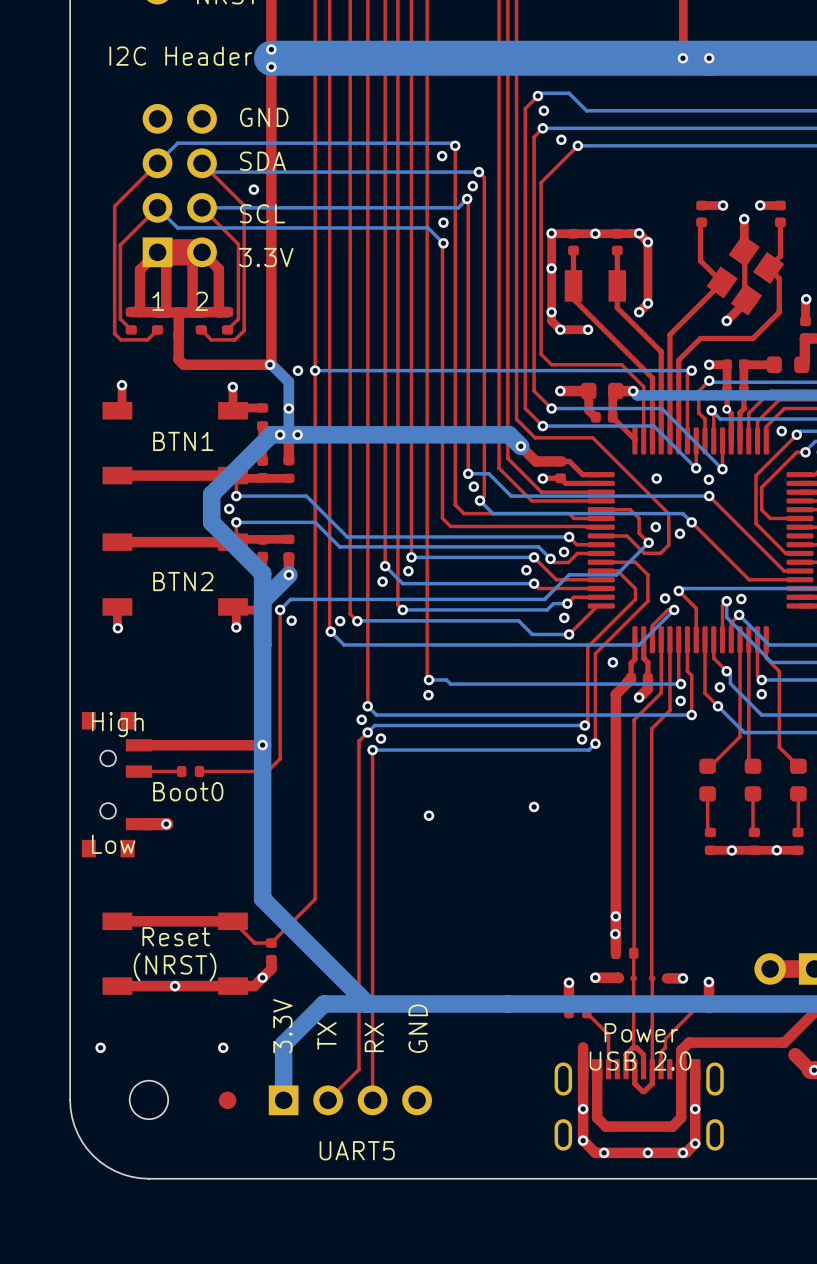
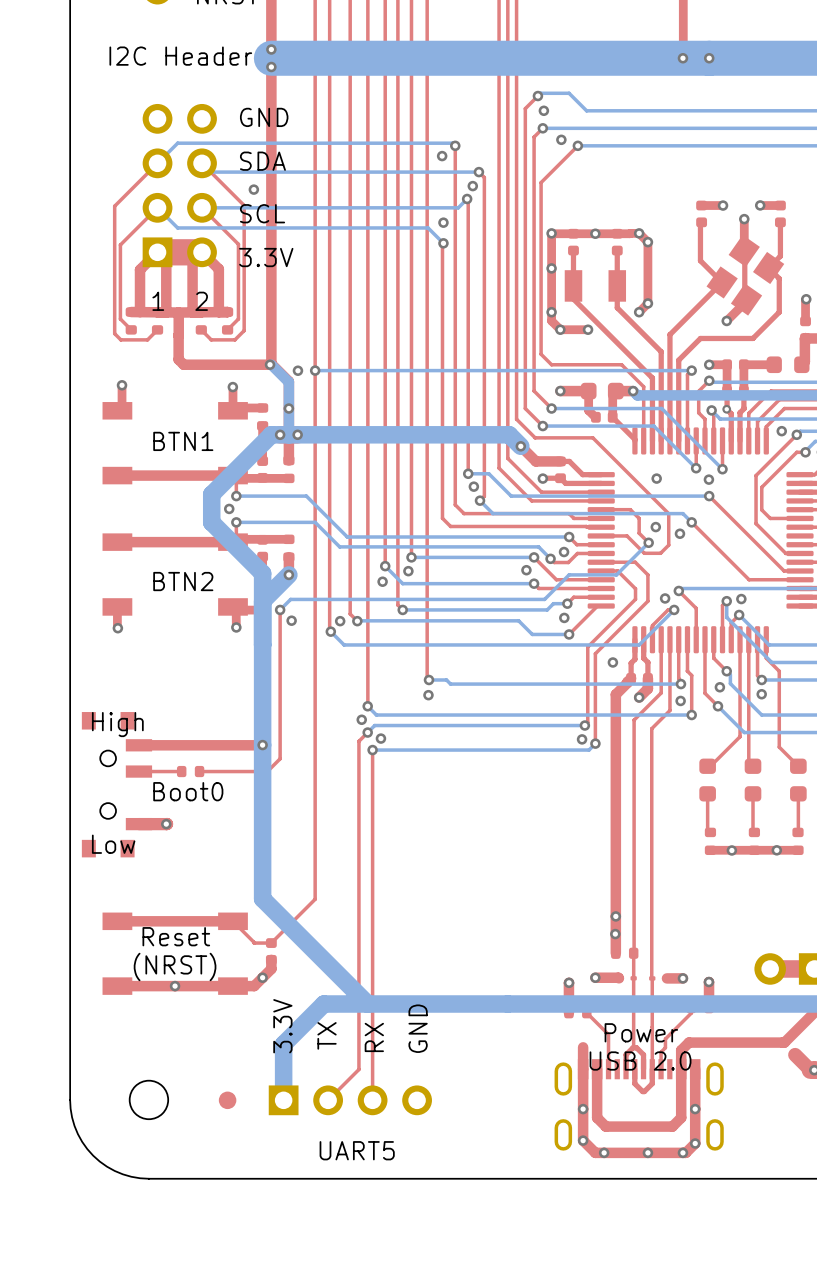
via: (534, 806) -> none
via: (429, 815) -> none
via: (100, 1047) -> none
via: (223, 1047) -> none

